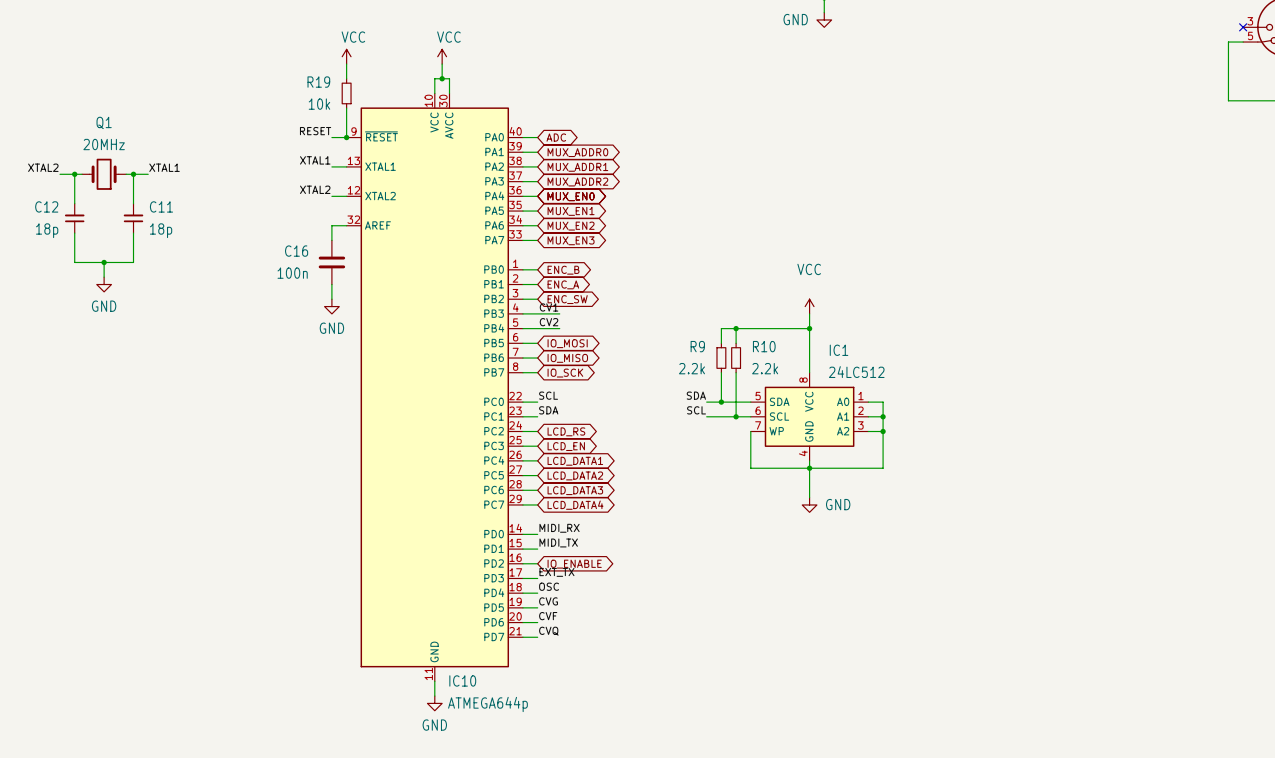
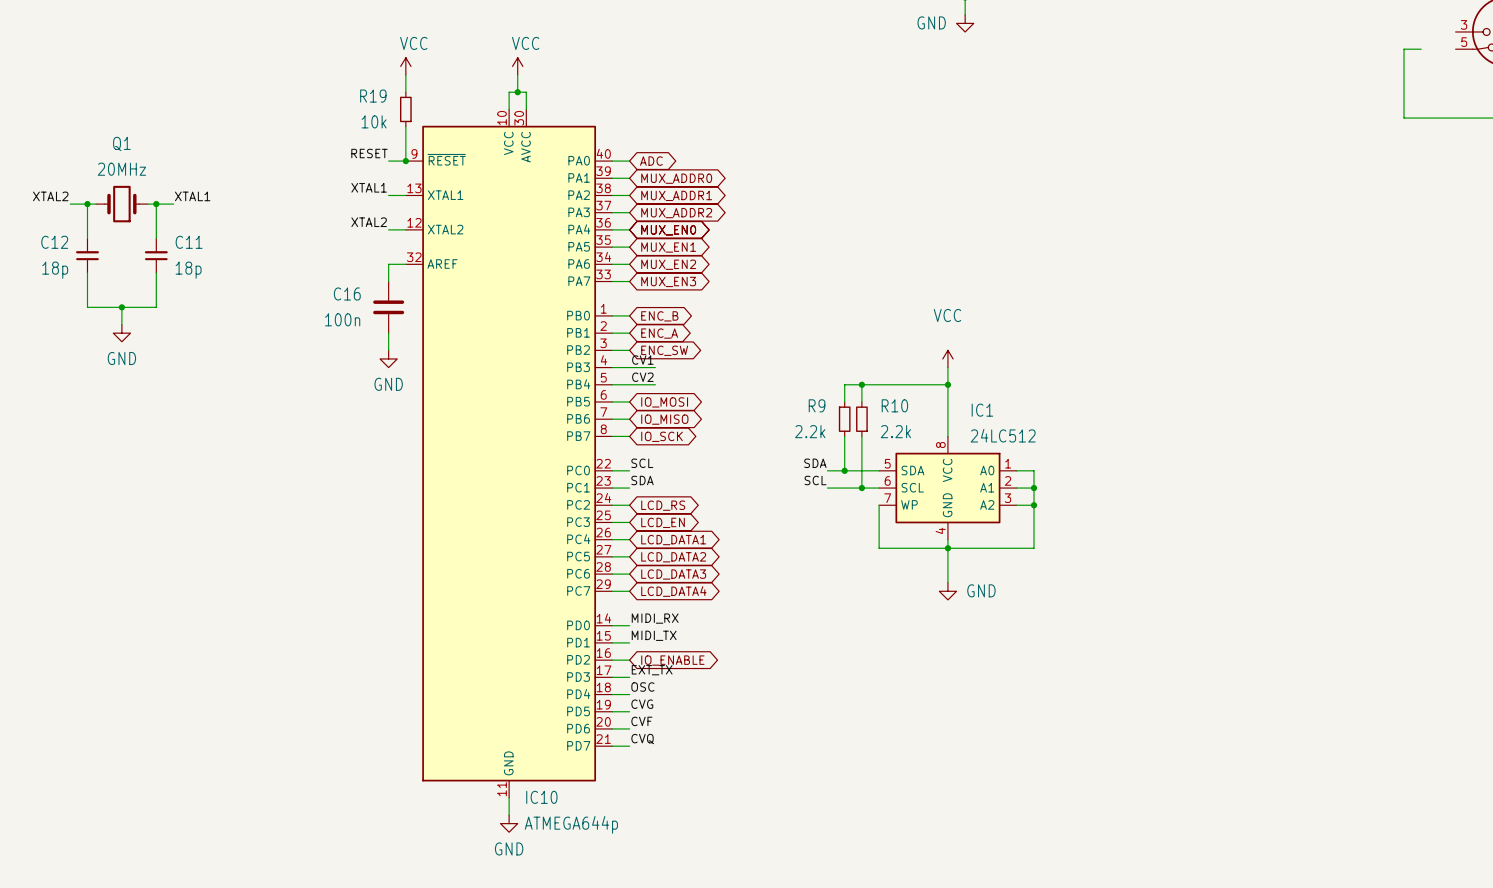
no-connect mark: (1243, 27) -> none
wire: (1243, 42) (1228, 42) (1228, 100) -> (1421, 49) (1404, 49) (1404, 118) (1438, 118)

